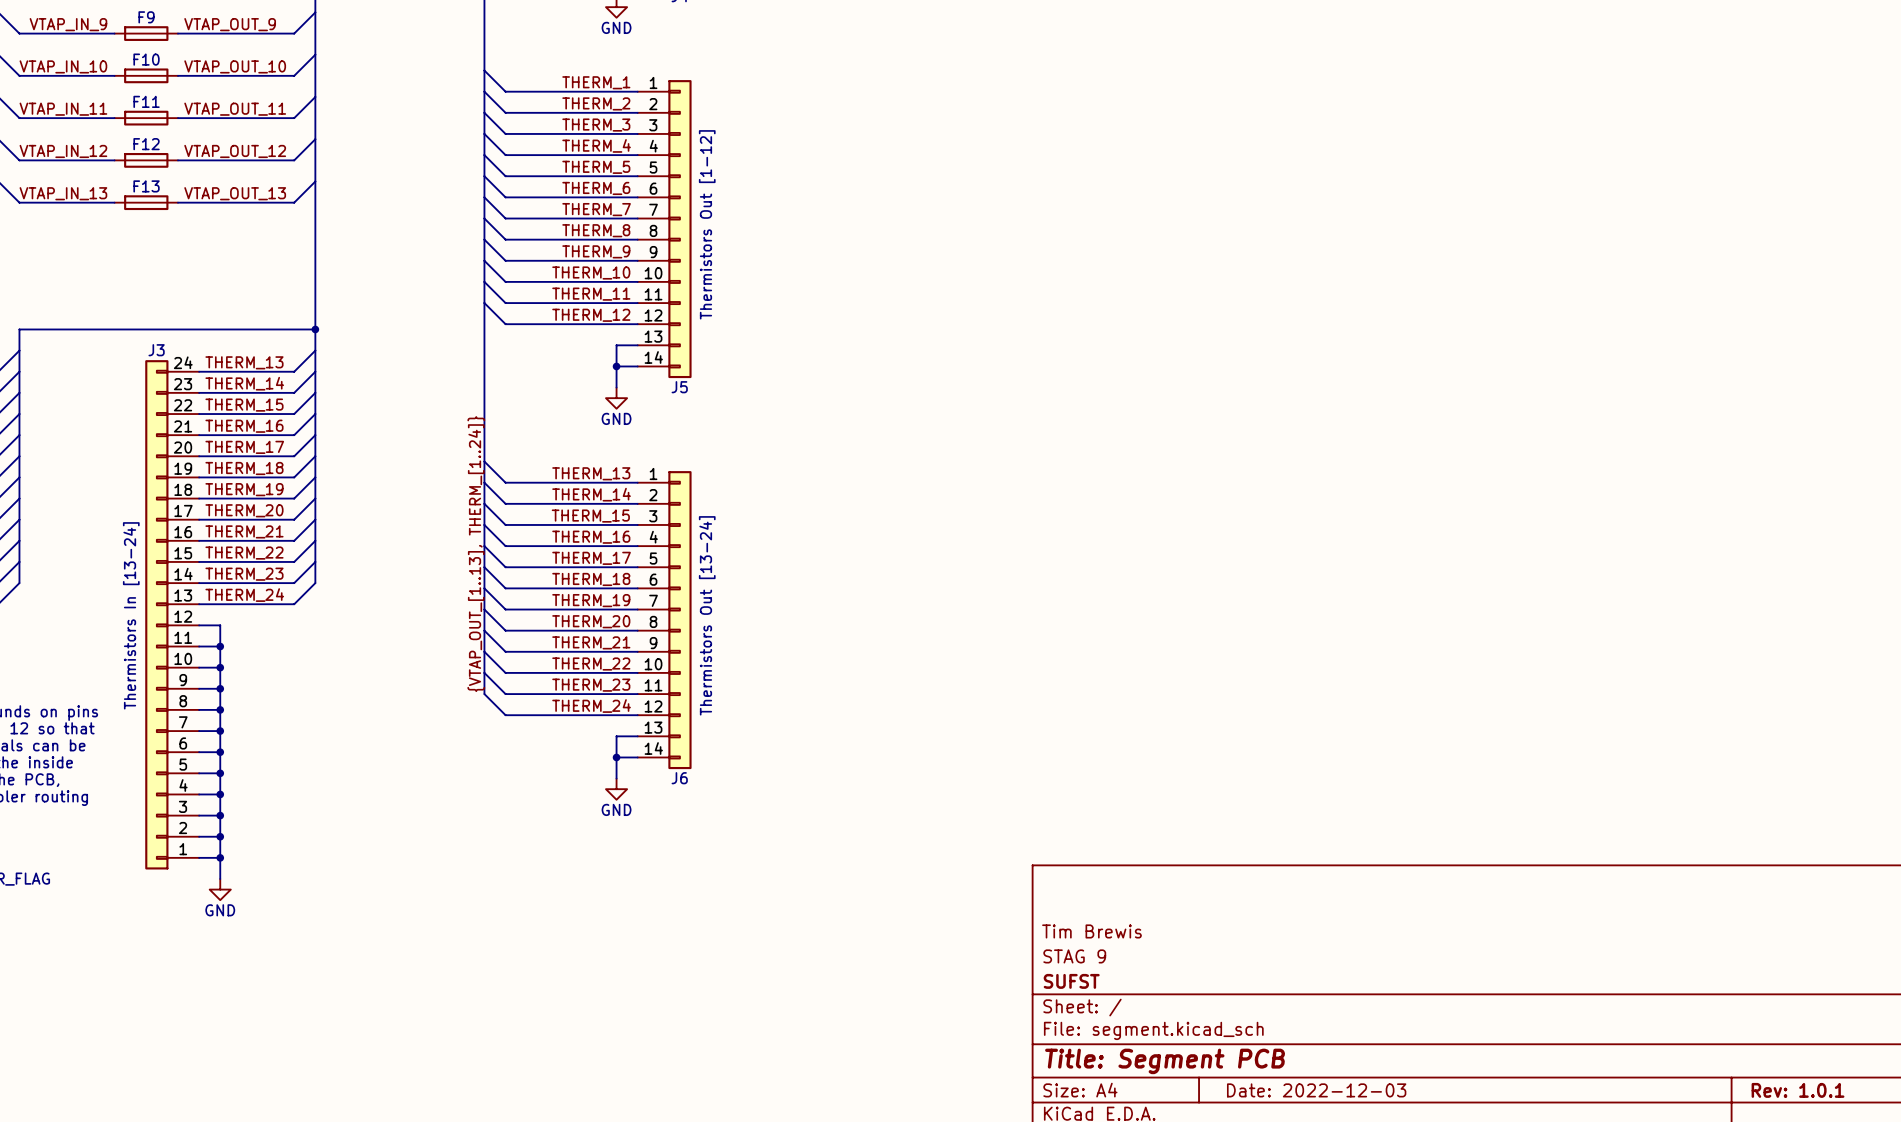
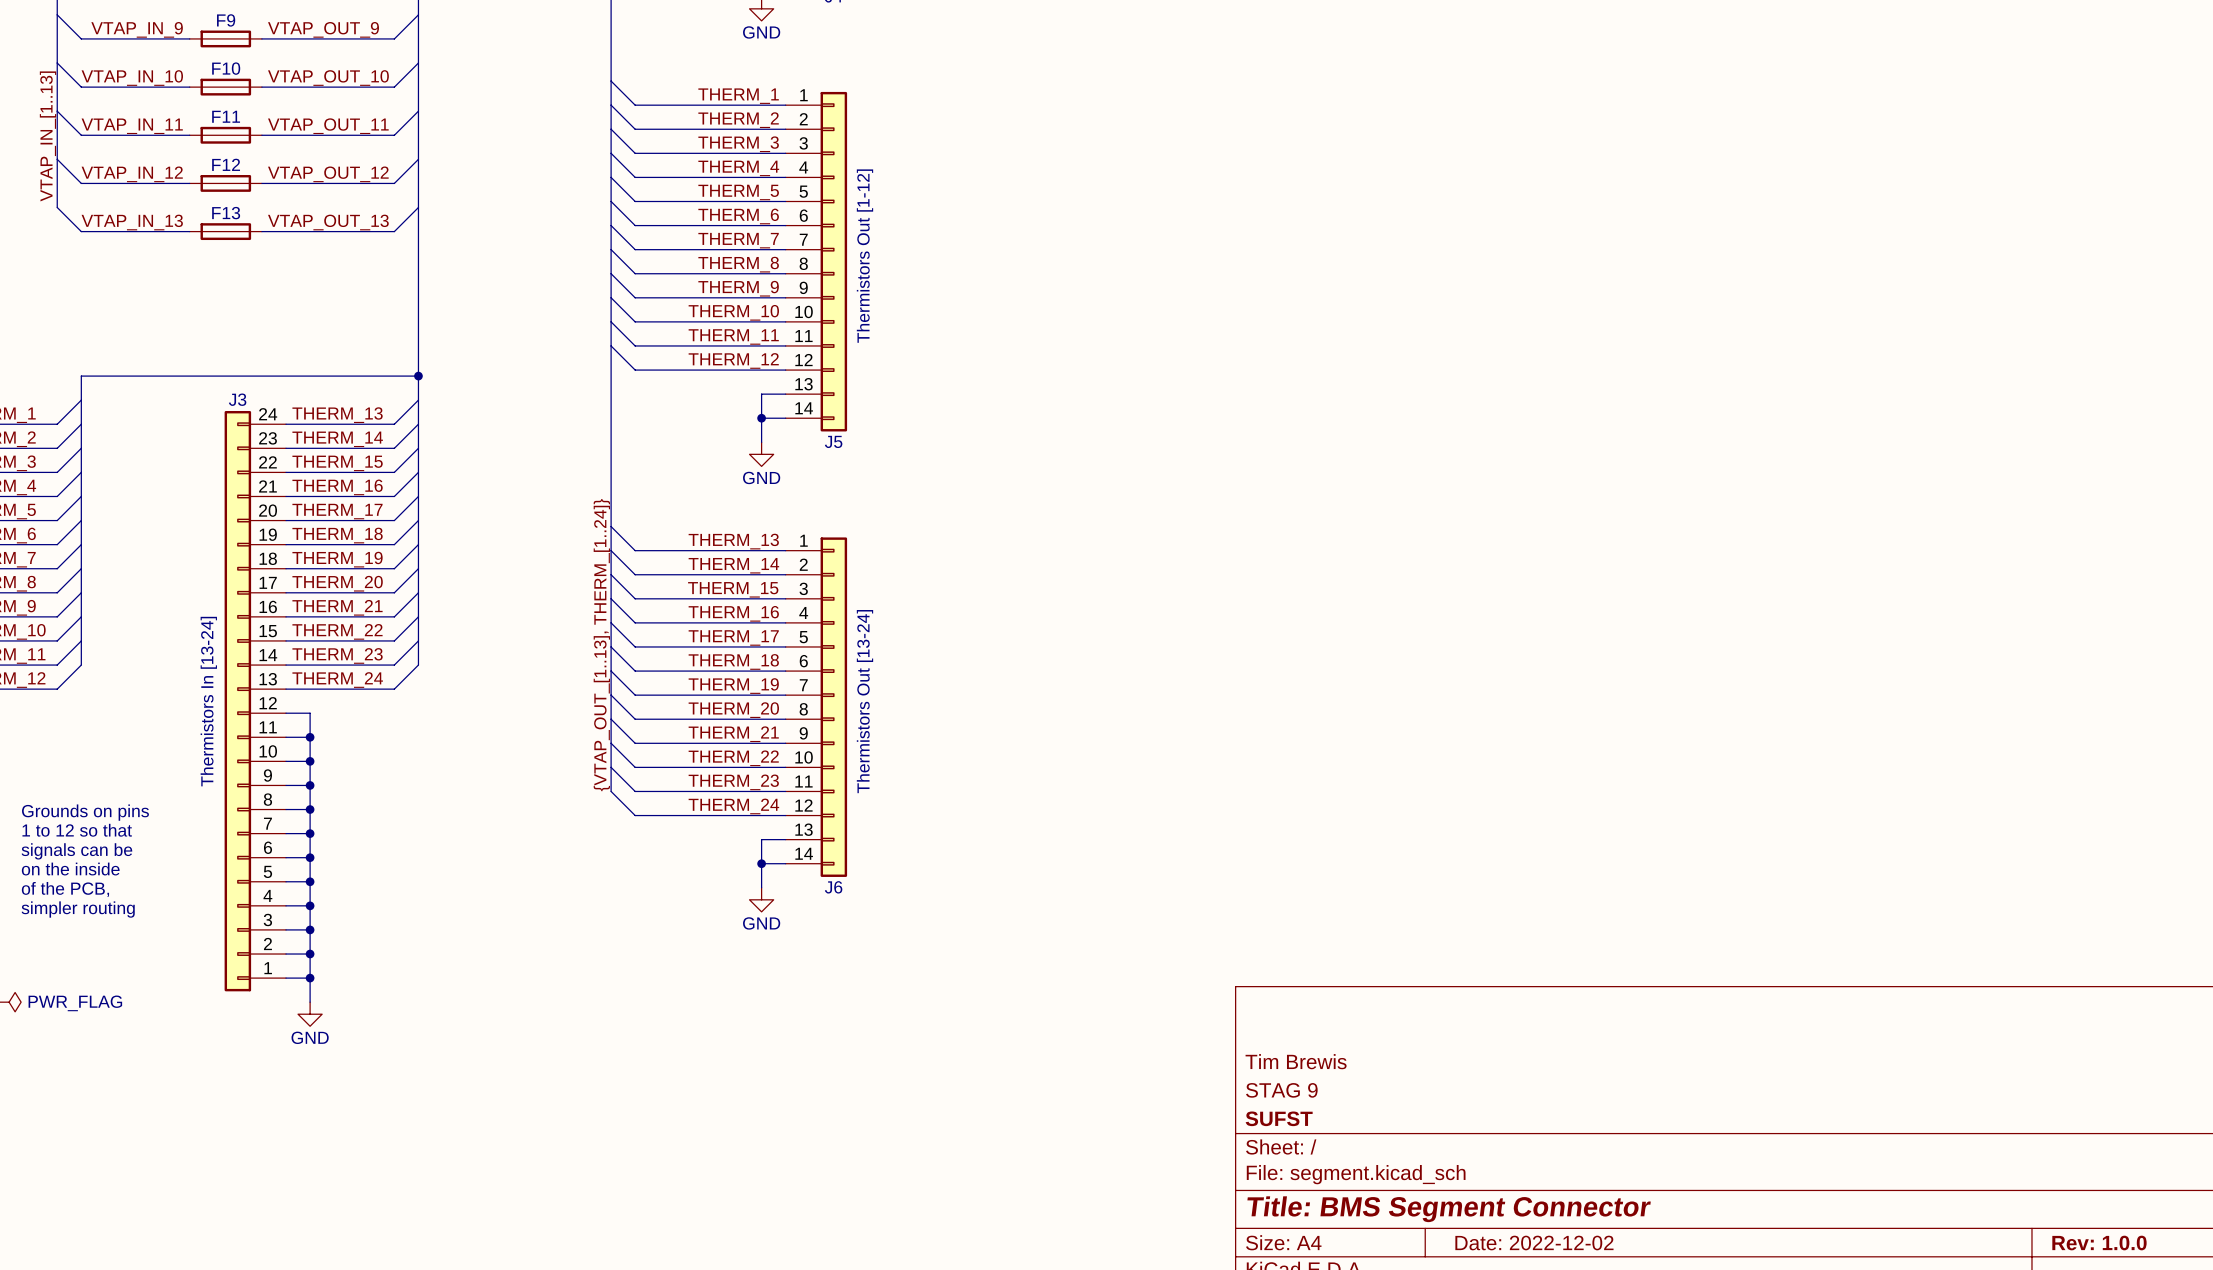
title block: Title: Segment PCB (1165, 1061) -> Title: BMS Segment Connector (1449, 1209)
title block: Date: 2022-12-03 (1316, 1090) -> Date: 2022-12-02 (1534, 1243)
title block: Rev: 1.0.1 (1798, 1090) -> Rev: 1.0.0 (2099, 1243)

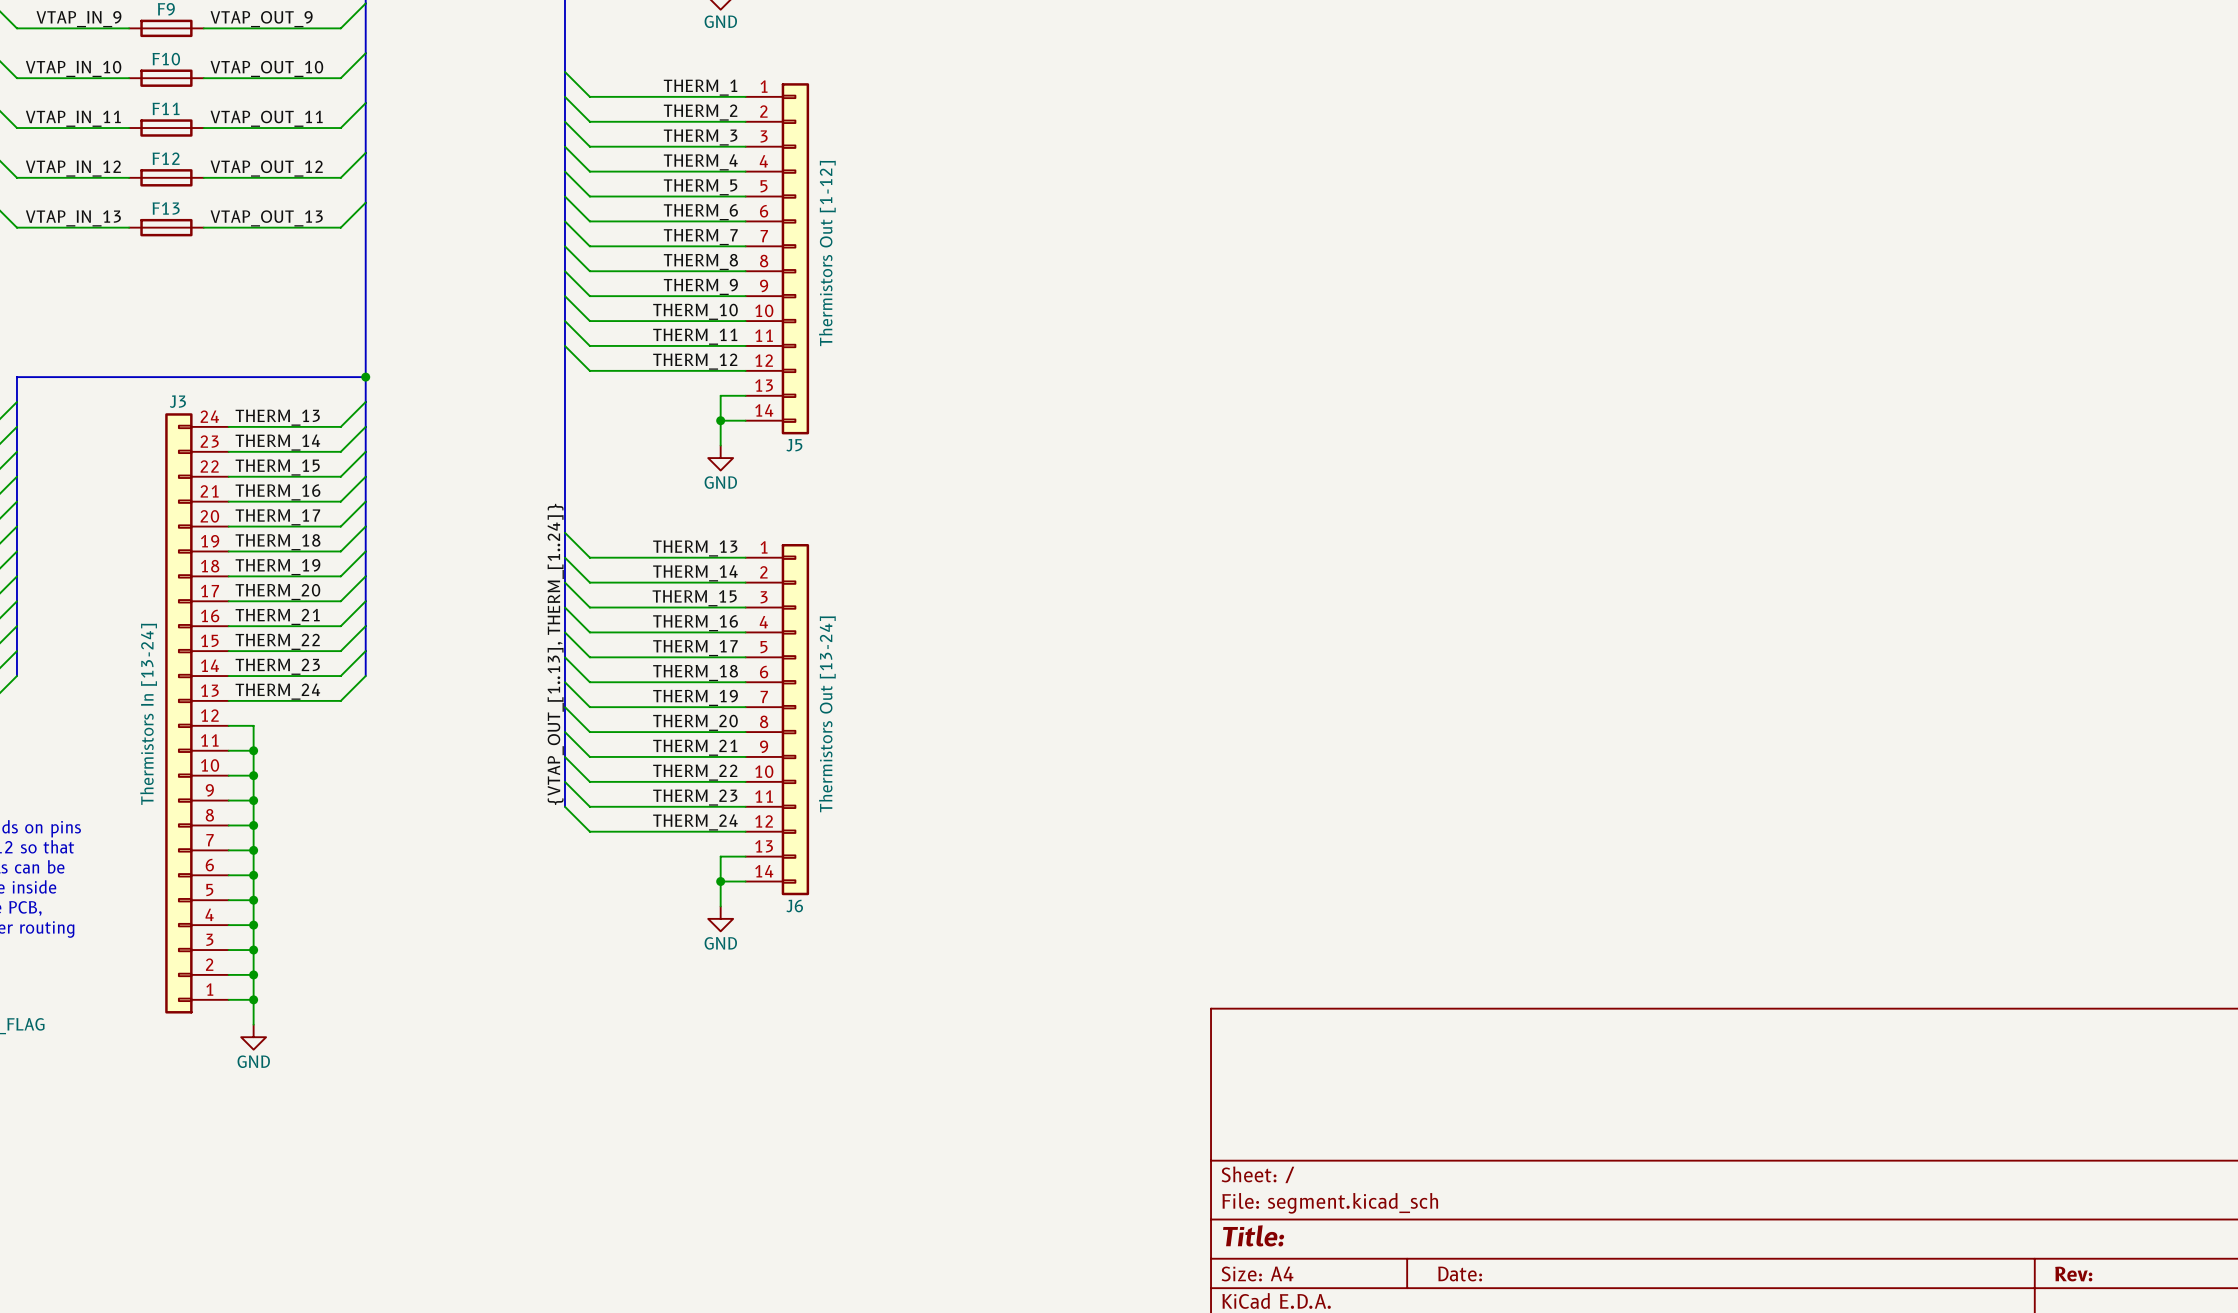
title block: Tim Brewis (1296, 1061) -> none
title block: STAG 9 (1281, 1090) -> none
title block: SUFST (1279, 1118) -> none
title block: Title: BMS Segment Connector (1449, 1209) -> Title: (1253, 1235)
title block: Date: 2022-12-02 (1534, 1243) -> Date: (1460, 1274)
title block: Rev: 1.0.0 (2099, 1243) -> Rev: (2073, 1274)

